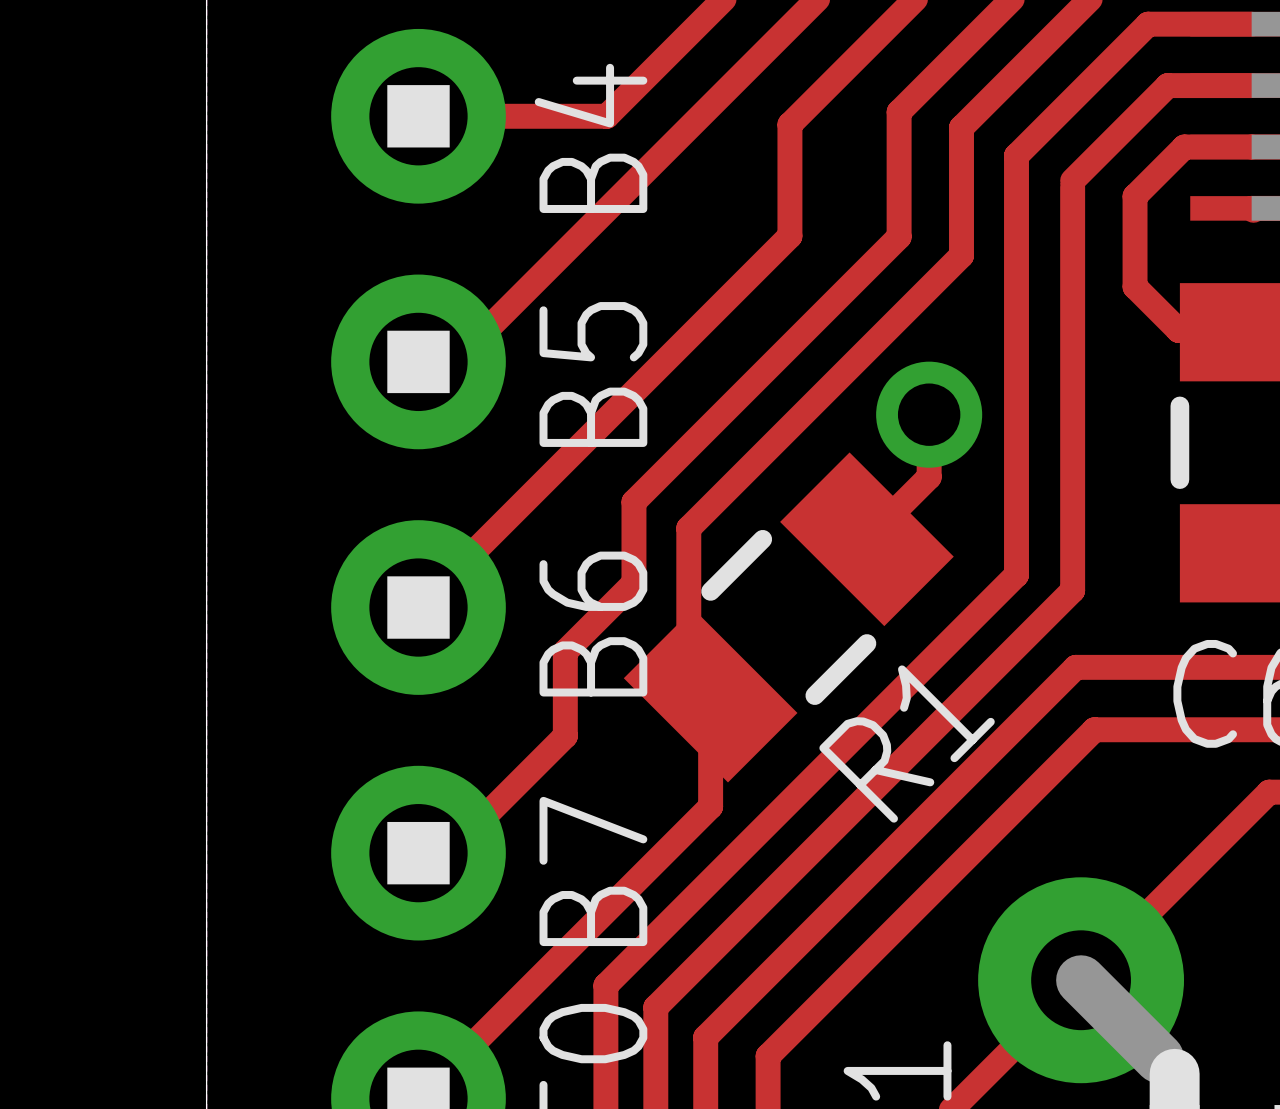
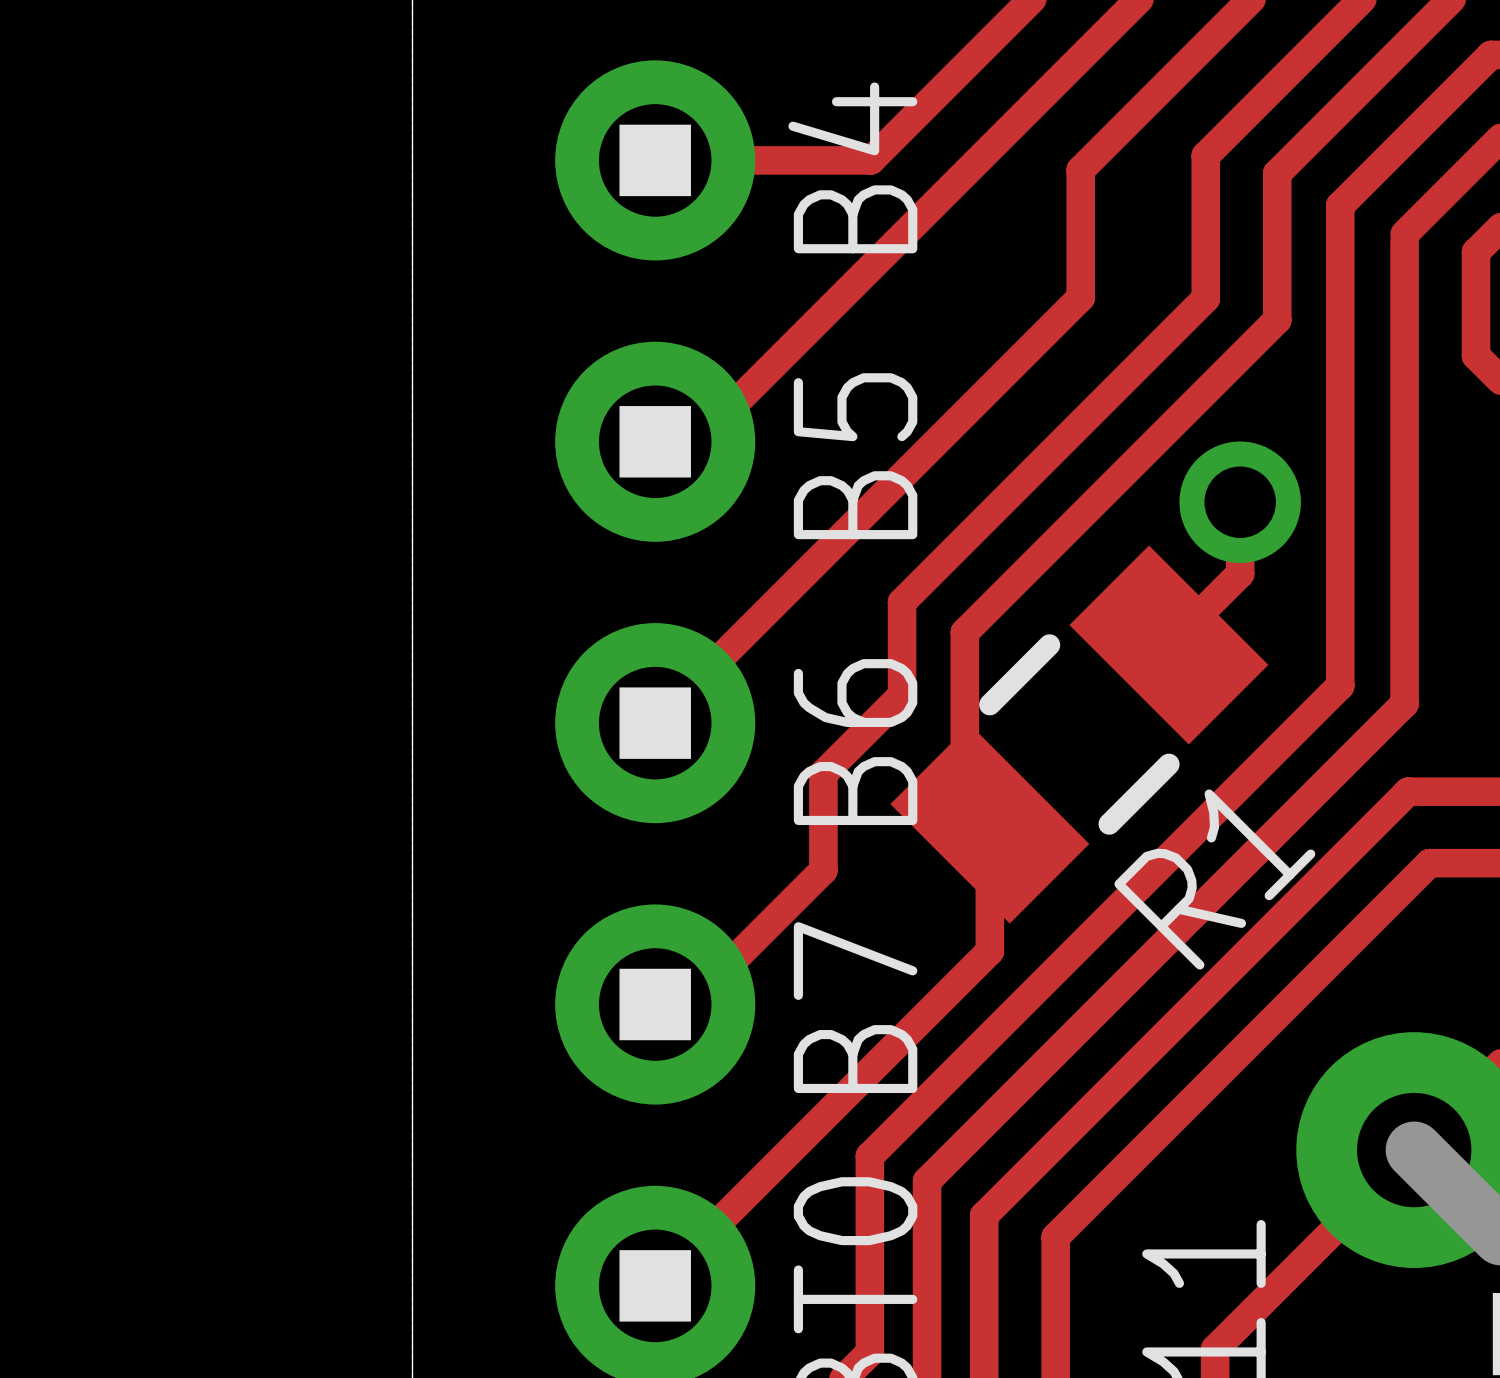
text position: B4 (591, 138) -> B4 (852, 167)
text position: B7 (593, 871) -> B7 (855, 1007)

